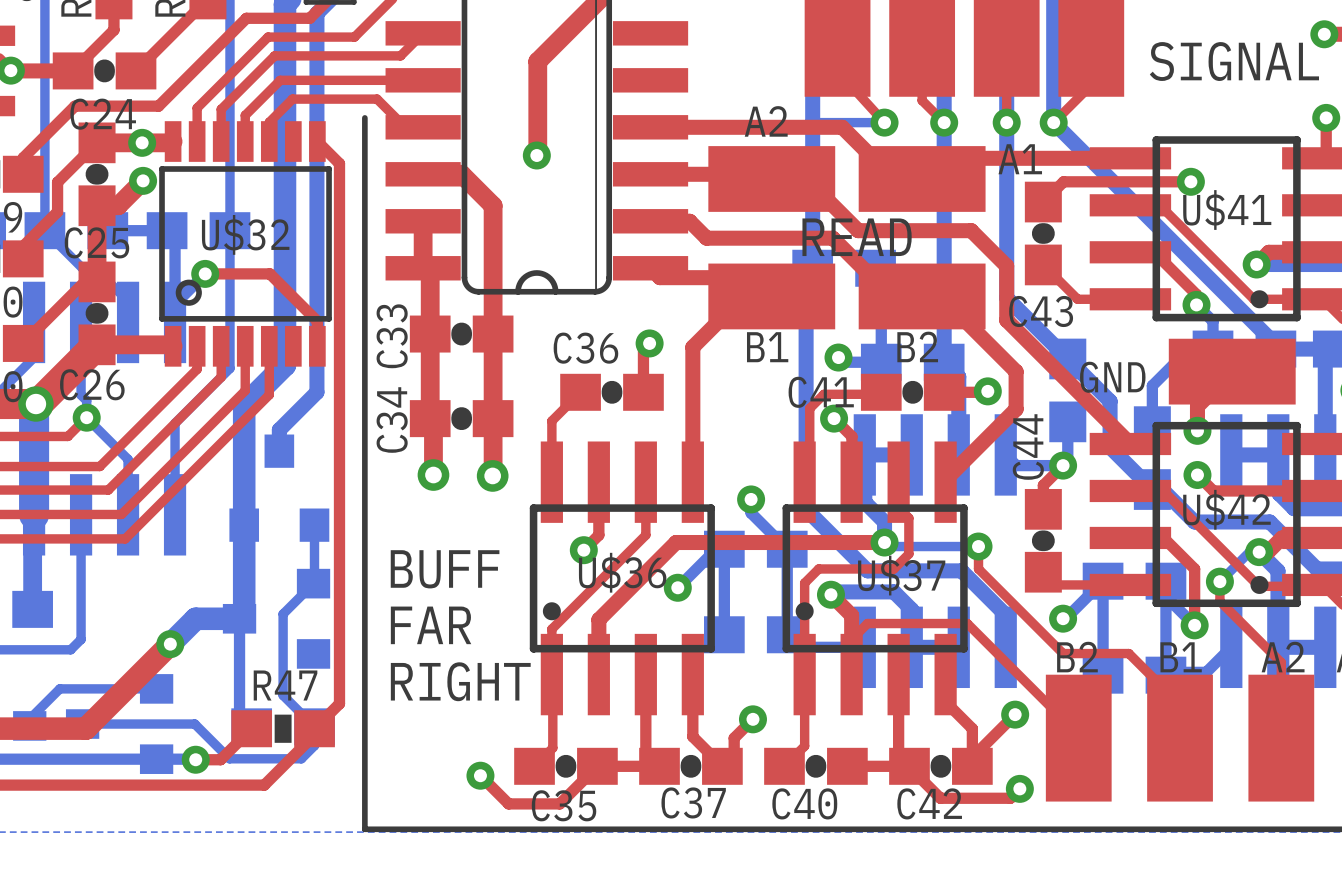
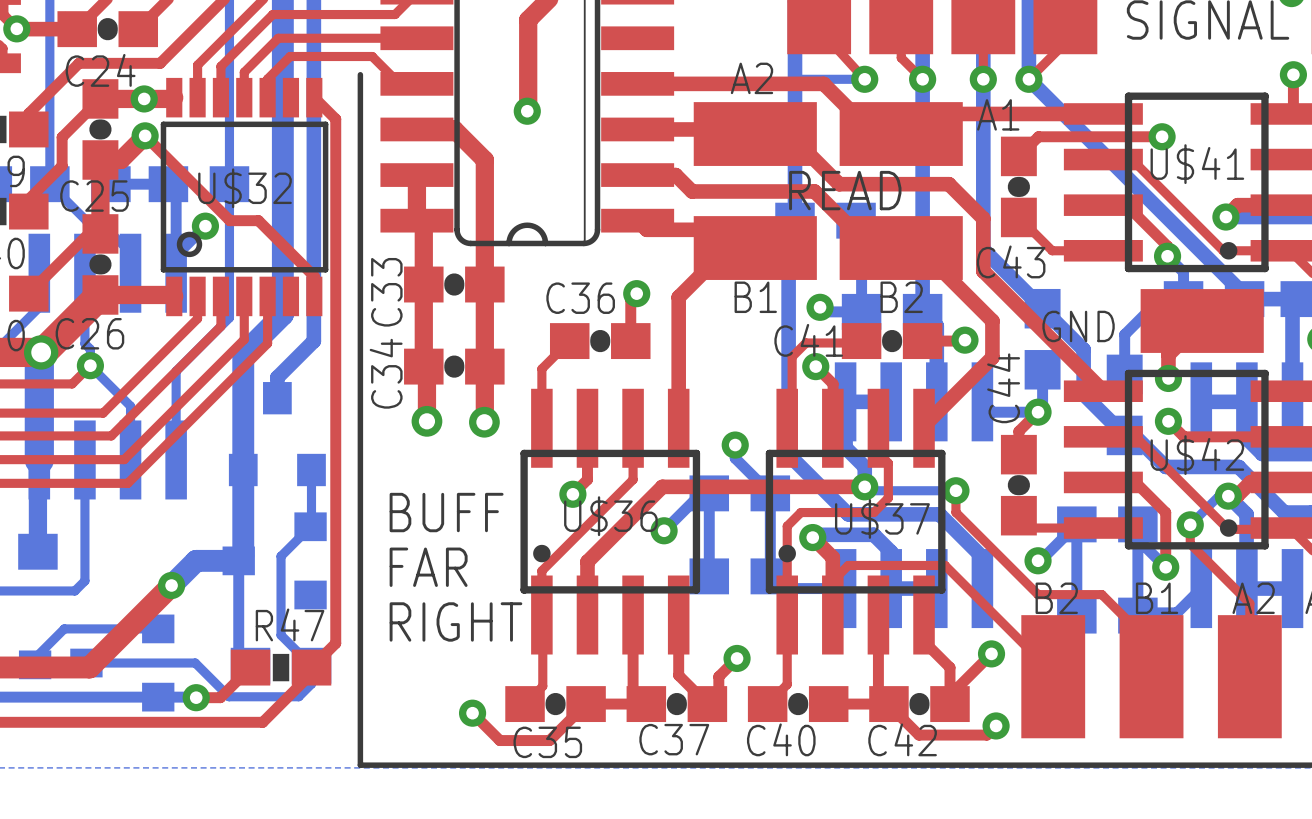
top track: (205, 273) (269, 273) (317, 321) (317, 325) -> (145, 135) (229, 220) (258, 220) (314, 276)

